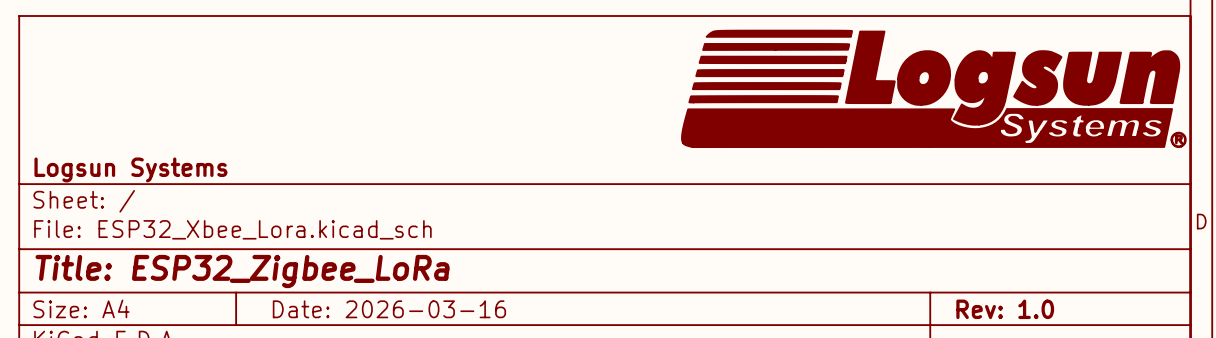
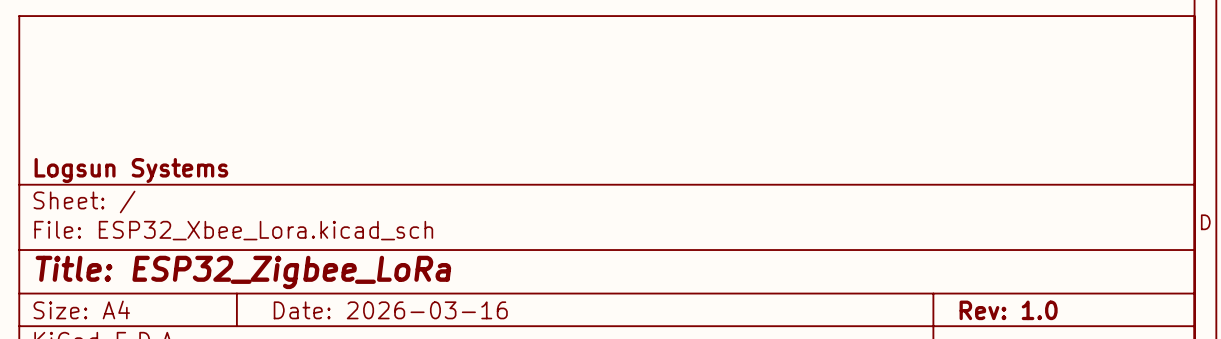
power symbol: (933, 88) -> none

